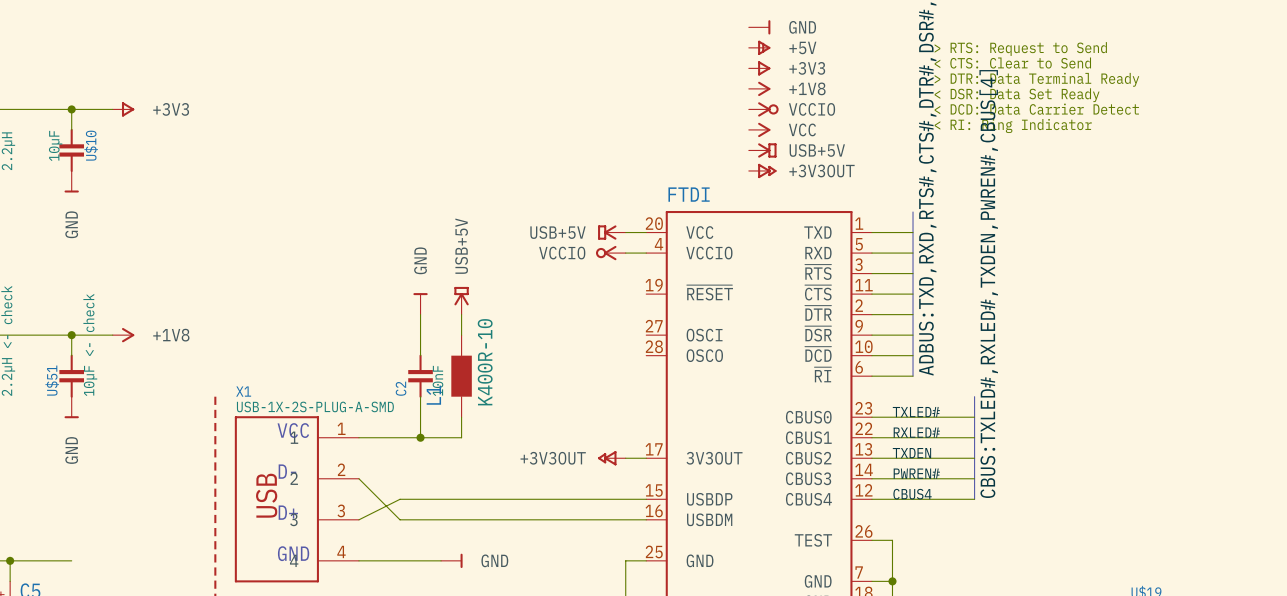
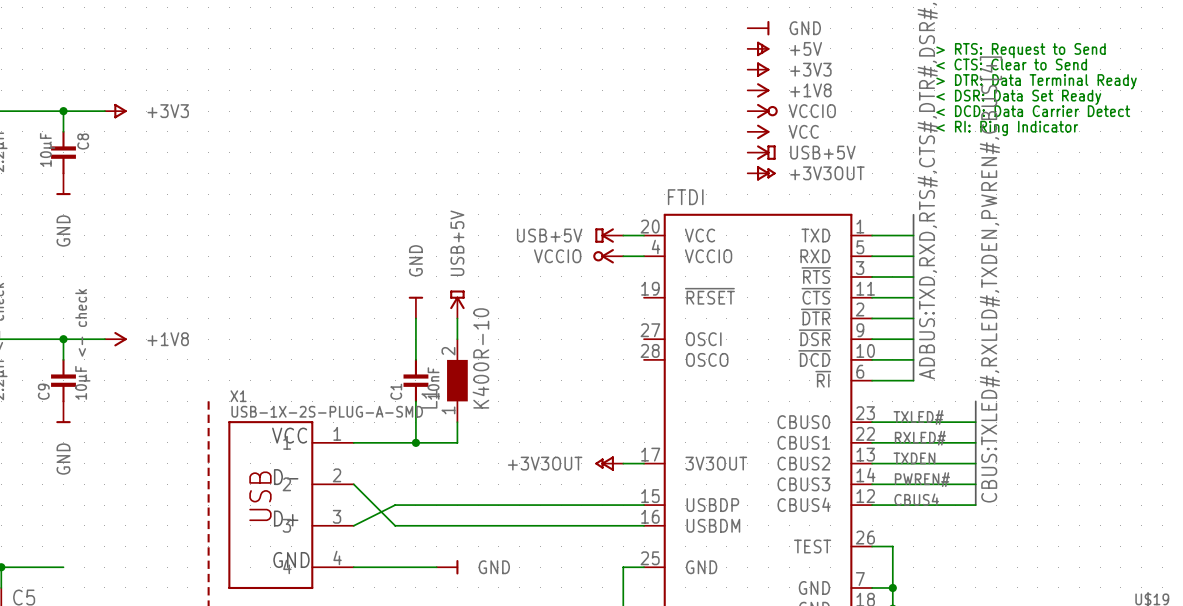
U$10 name: U$10 (91, 145) -> C8 (83, 141)
L1 pin number: none -> 2 (448, 351)
U$51 name: U$51 (52, 380) -> C9 (43, 391)
C2 name: C2 (401, 388) -> C1 (396, 391)
L1 pin number: none -> 1 (448, 410)

